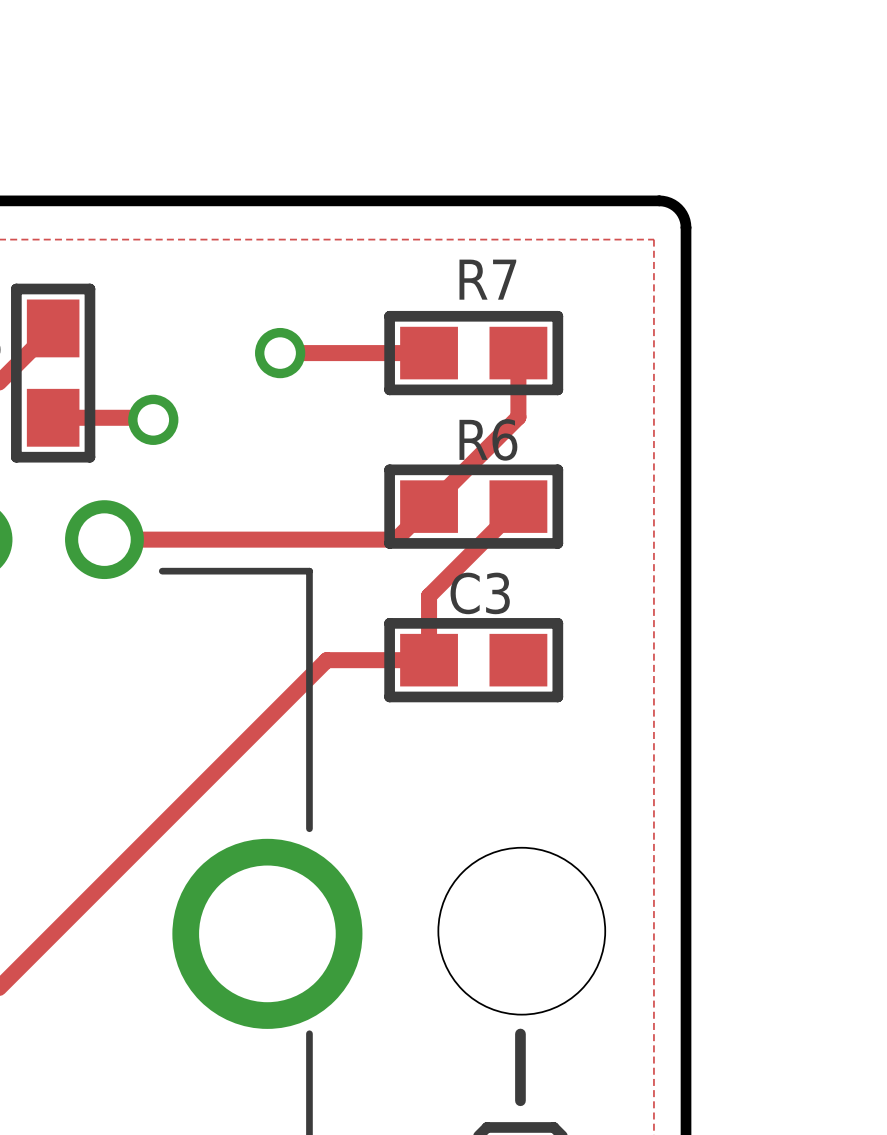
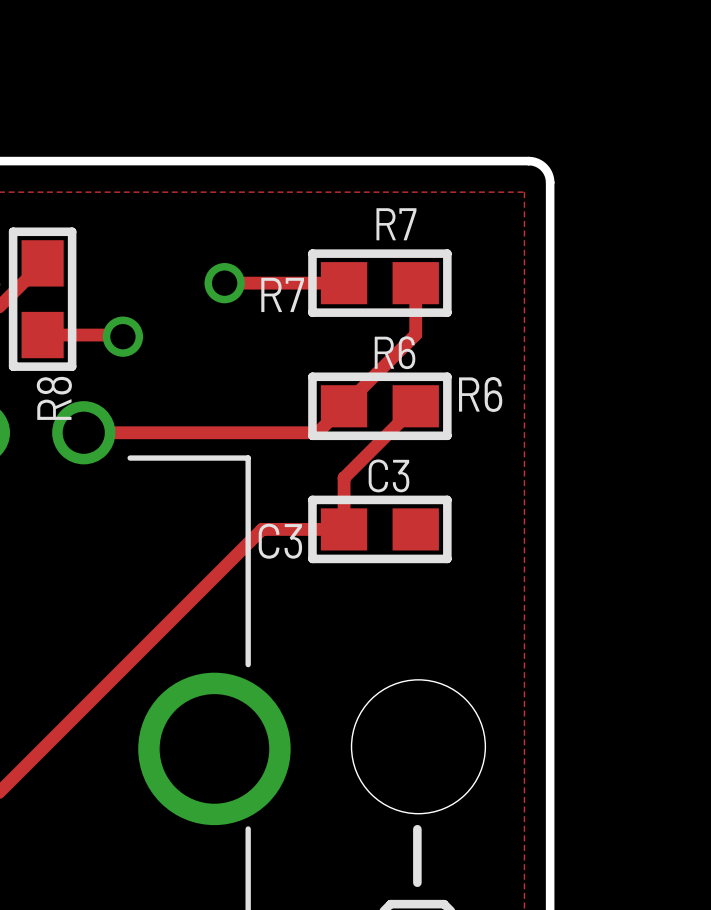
R7 name: none -> R7 (282, 294)
R6 name: none -> R6 (480, 394)
R8 name: none -> R8 (54, 398)
C3 name: none -> C3 (280, 541)

